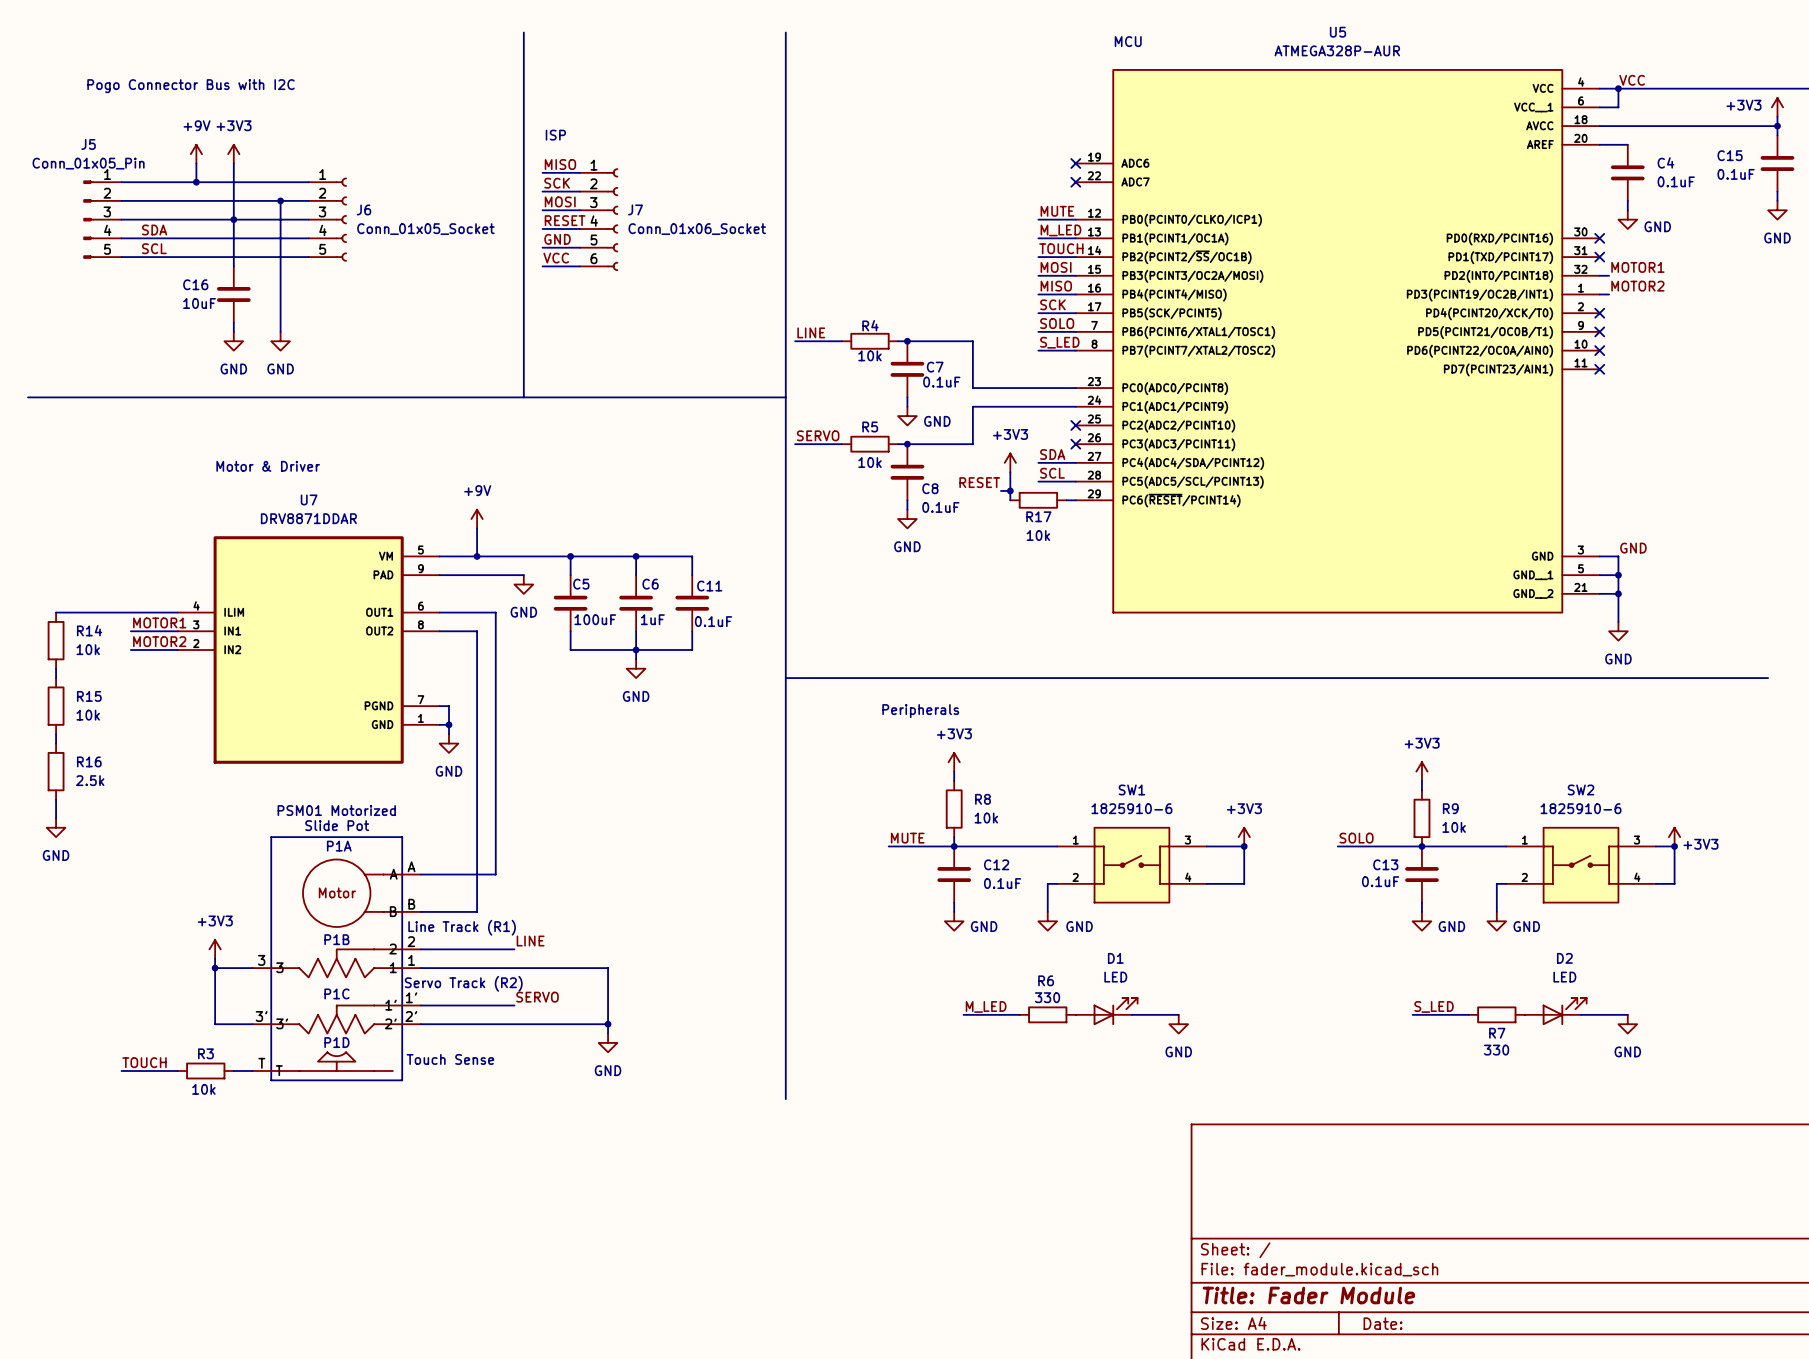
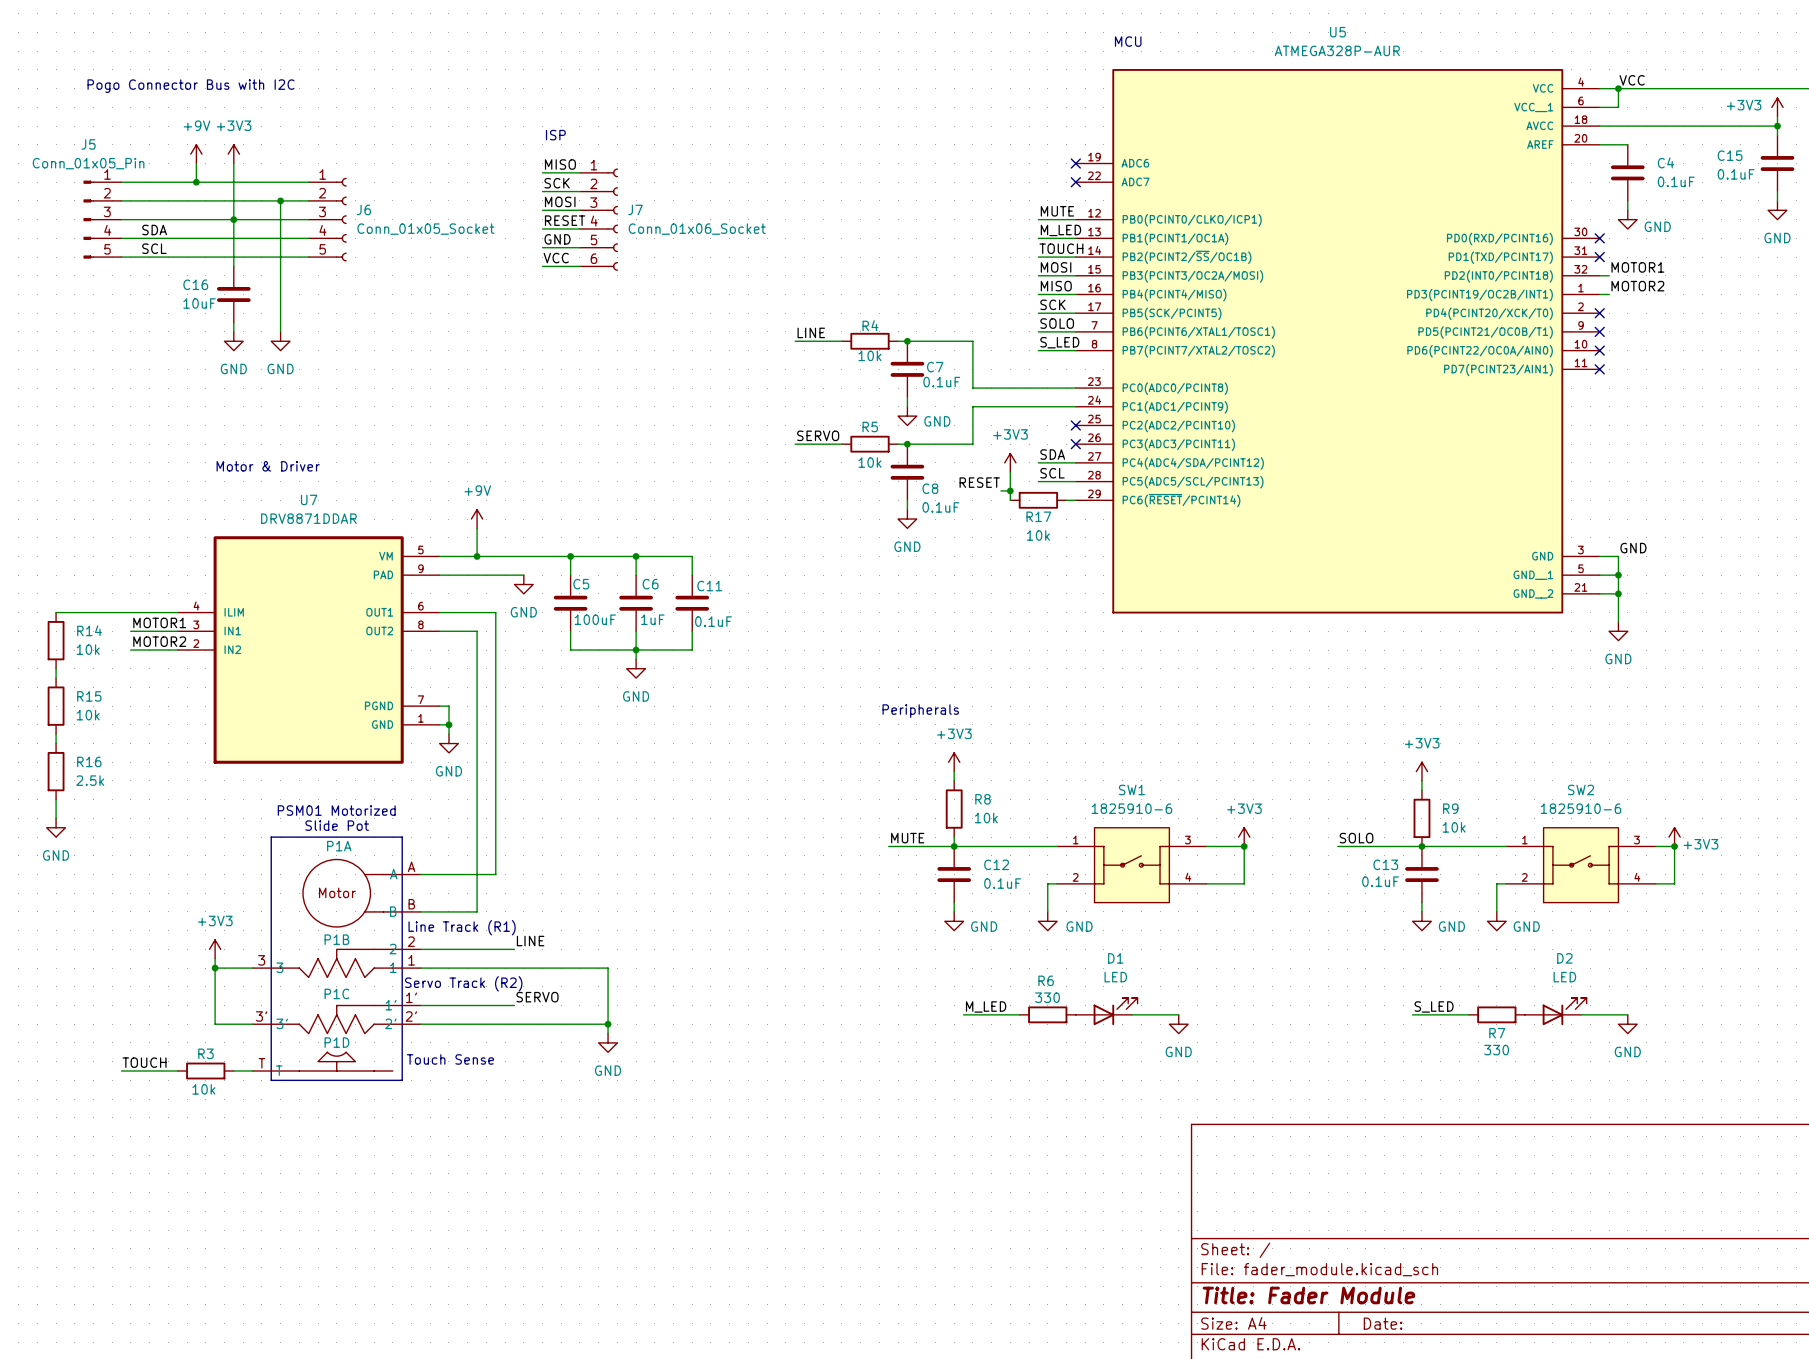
line: (523, 32) (523, 397) -> none
line: (785, 32) (785, 1099) -> none
line: (27, 397) (785, 397) -> none
line: (785, 678) (1768, 678) -> none

